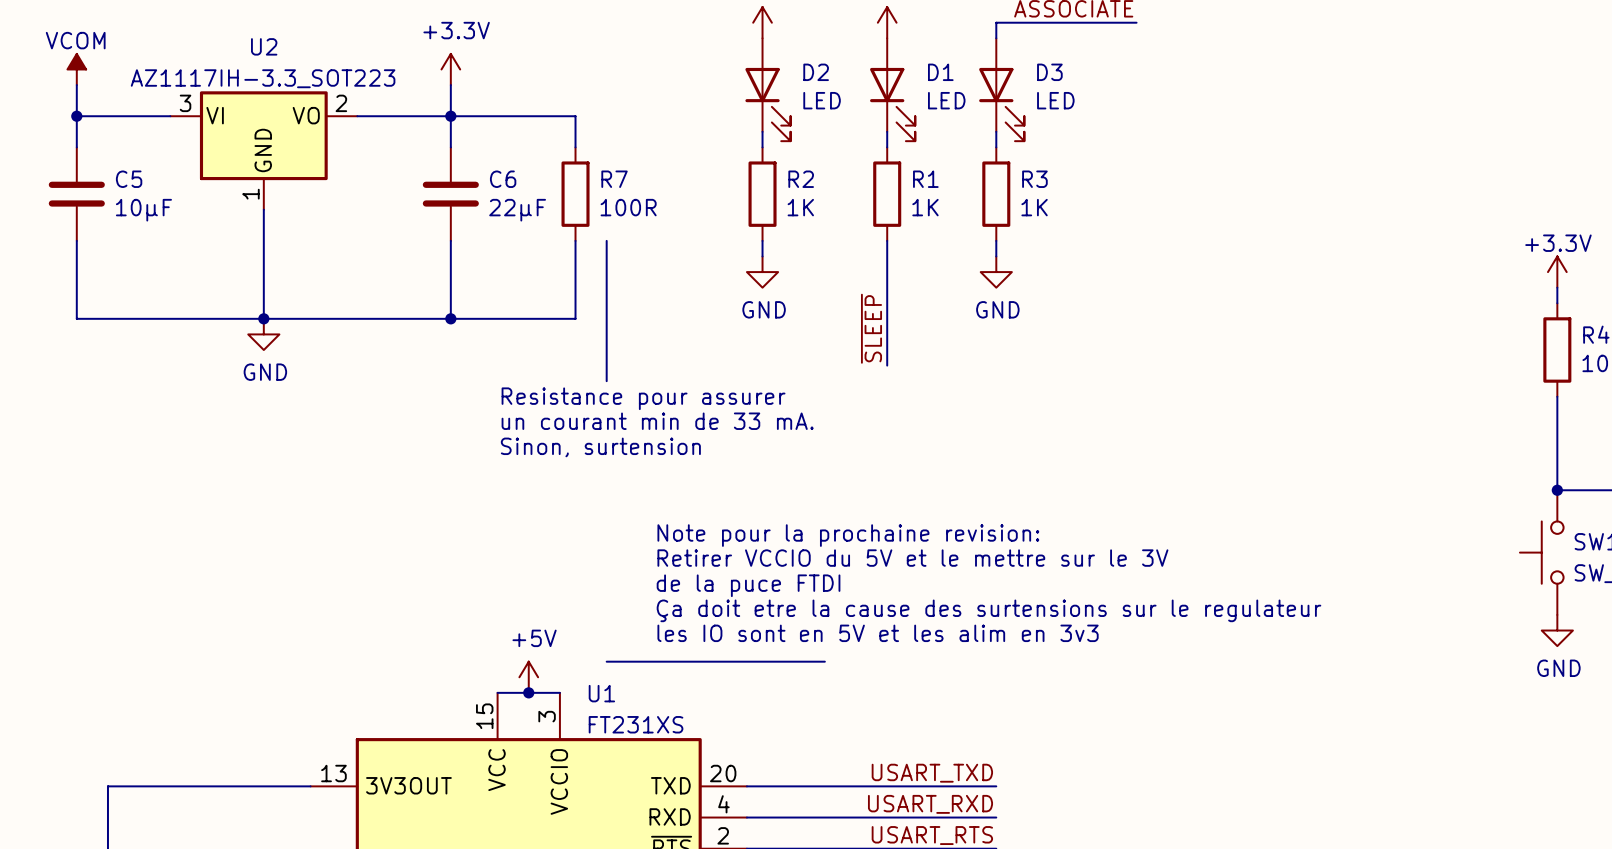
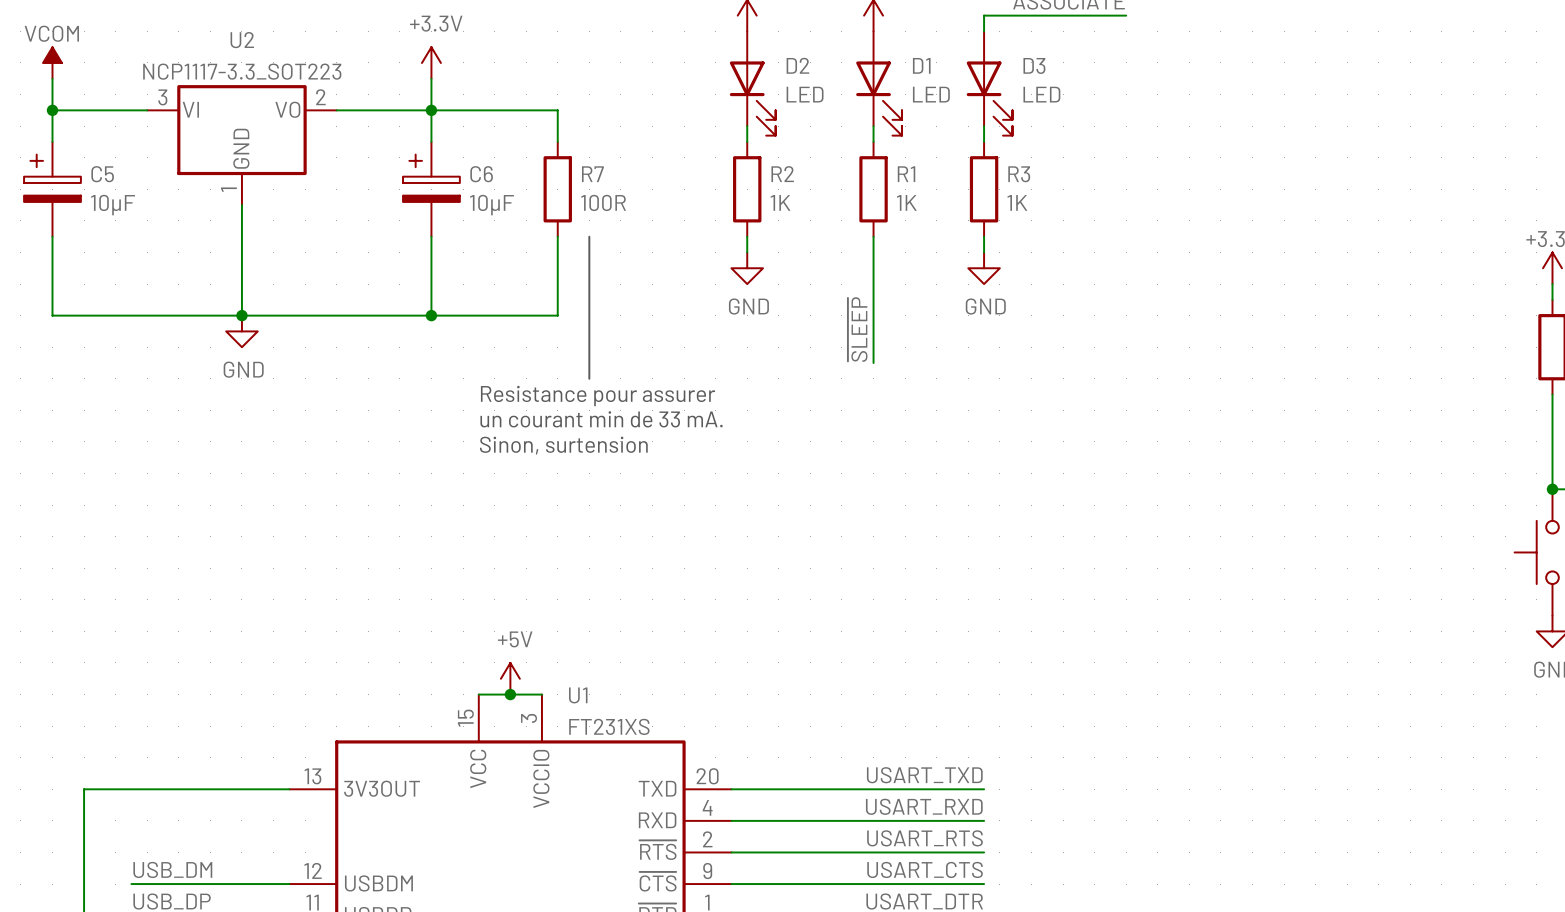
U2 value: AZ1117IH-3.3_SOT223 (263, 78) -> NCP1117-3.3_SOT223 (242, 71)
C5 symbol: [48, 147, 105, 241] -> [24, 141, 81, 237]
C6 symbol: [422, 147, 479, 241] -> [403, 141, 460, 237]
C6 value: 22µF (517, 210) -> 10µF (491, 205)
text: Note pour la prochaine revision: (848, 535) -> none
text: Retirer VCCIO du 5V et le mettre sur le 3V (912, 558) -> none
text: de la puce FTDI (748, 585) -> none
text: Ça doit etre la cause des surtensions sur le regulateur (988, 610) -> none
text: les IO sont en 5V et les alim en 3v3 (878, 633) -> none
line: (606, 661) (824, 661) -> none

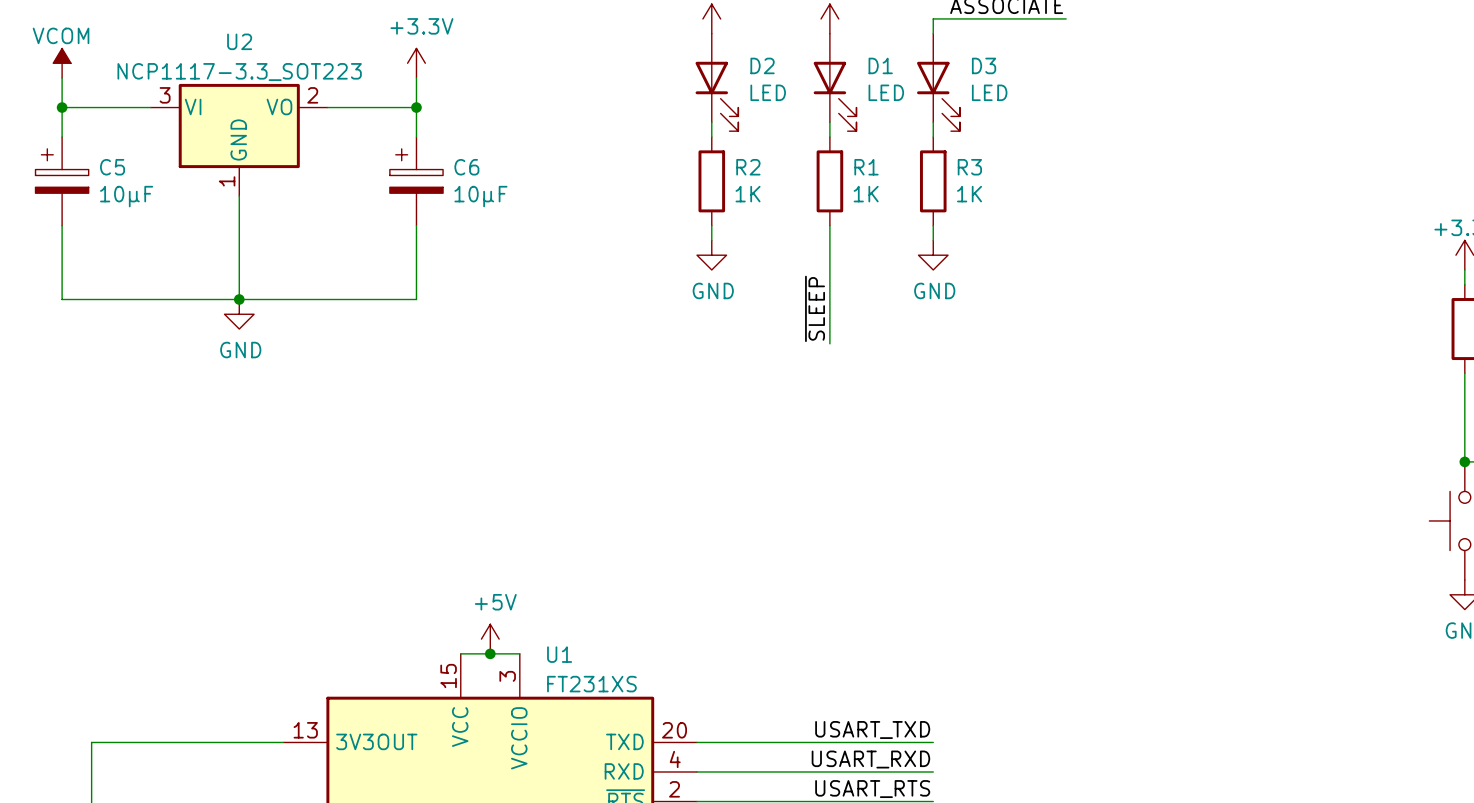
wire: (431, 110) (557, 110) (557, 141) -> none
R7: 100R (557, 189) -> none
wire: (557, 236) (557, 315) (431, 315) -> none
line: (589, 236) (589, 378) -> none
junction: (431, 315) -> none
text: Resistance pour assurer (598, 396) -> none
text: un courant min de 33 mA. (601, 419) -> none
text: Sinon, surtension (563, 445) -> none

